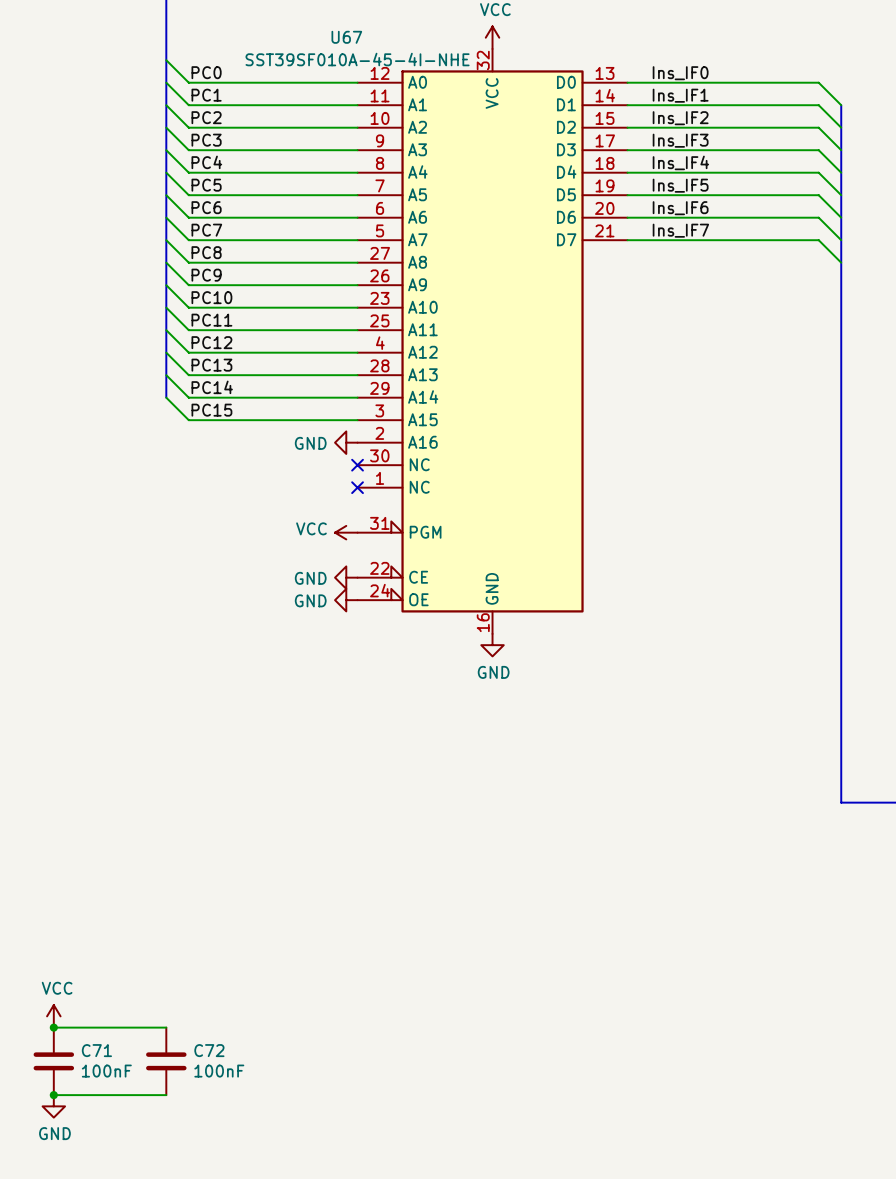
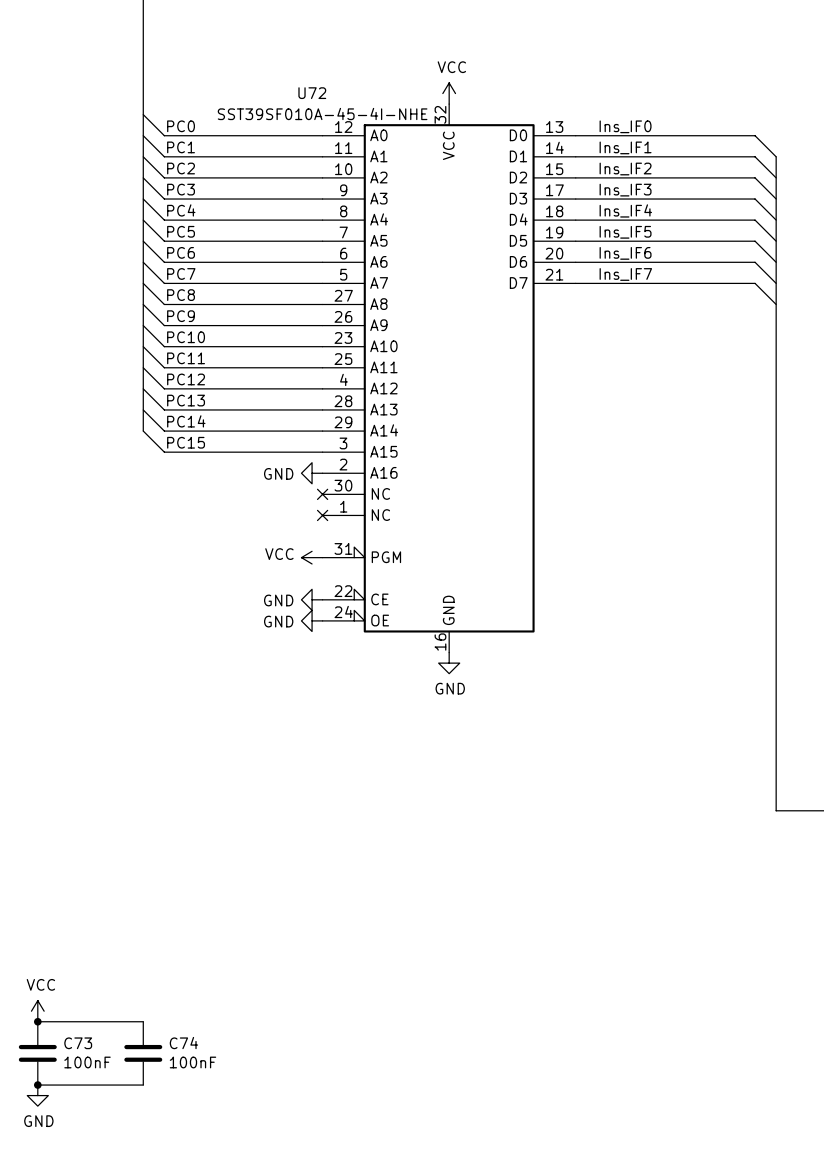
U67 name: U67 (346, 37) -> U72 (312, 93)
C71 name: C71 (96, 1050) -> C73 (78, 1043)
C72 name: C72 (209, 1050) -> C74 (183, 1043)

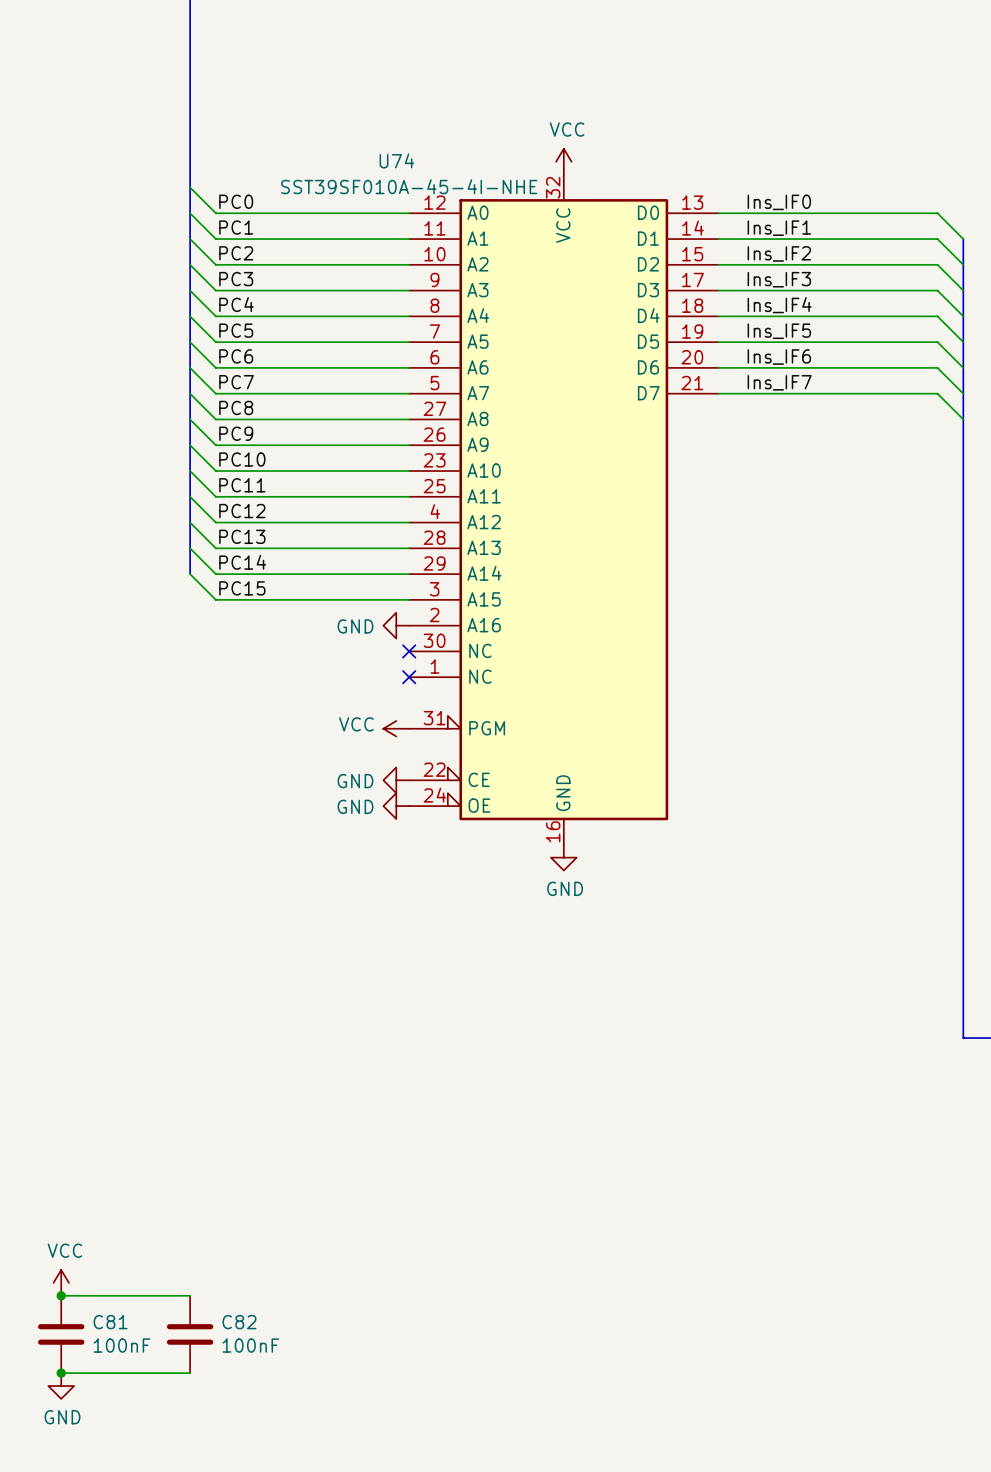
U72 name: U72 (312, 93) -> U74 (396, 160)
C73 name: C73 (78, 1043) -> C81 (110, 1322)
C74 name: C74 (183, 1043) -> C82 (239, 1322)

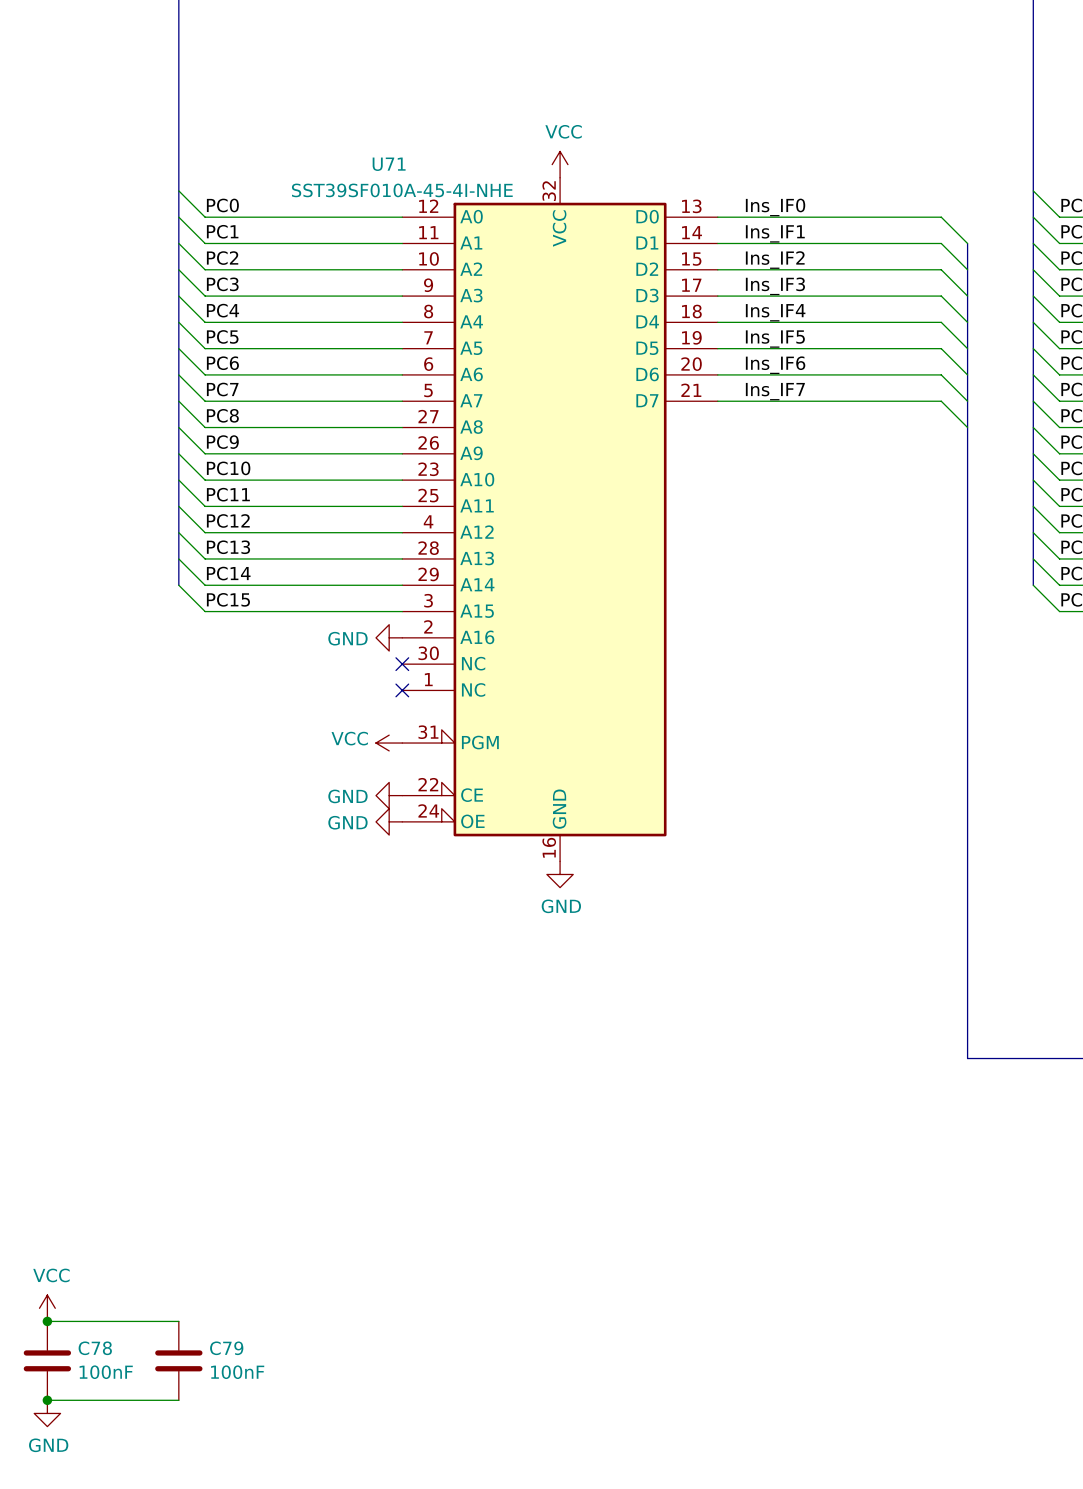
U74 name: U74 (396, 160) -> U71 (389, 164)
C81 name: C81 (110, 1322) -> C78 (95, 1348)
C82 name: C82 (239, 1322) -> C79 (226, 1348)

